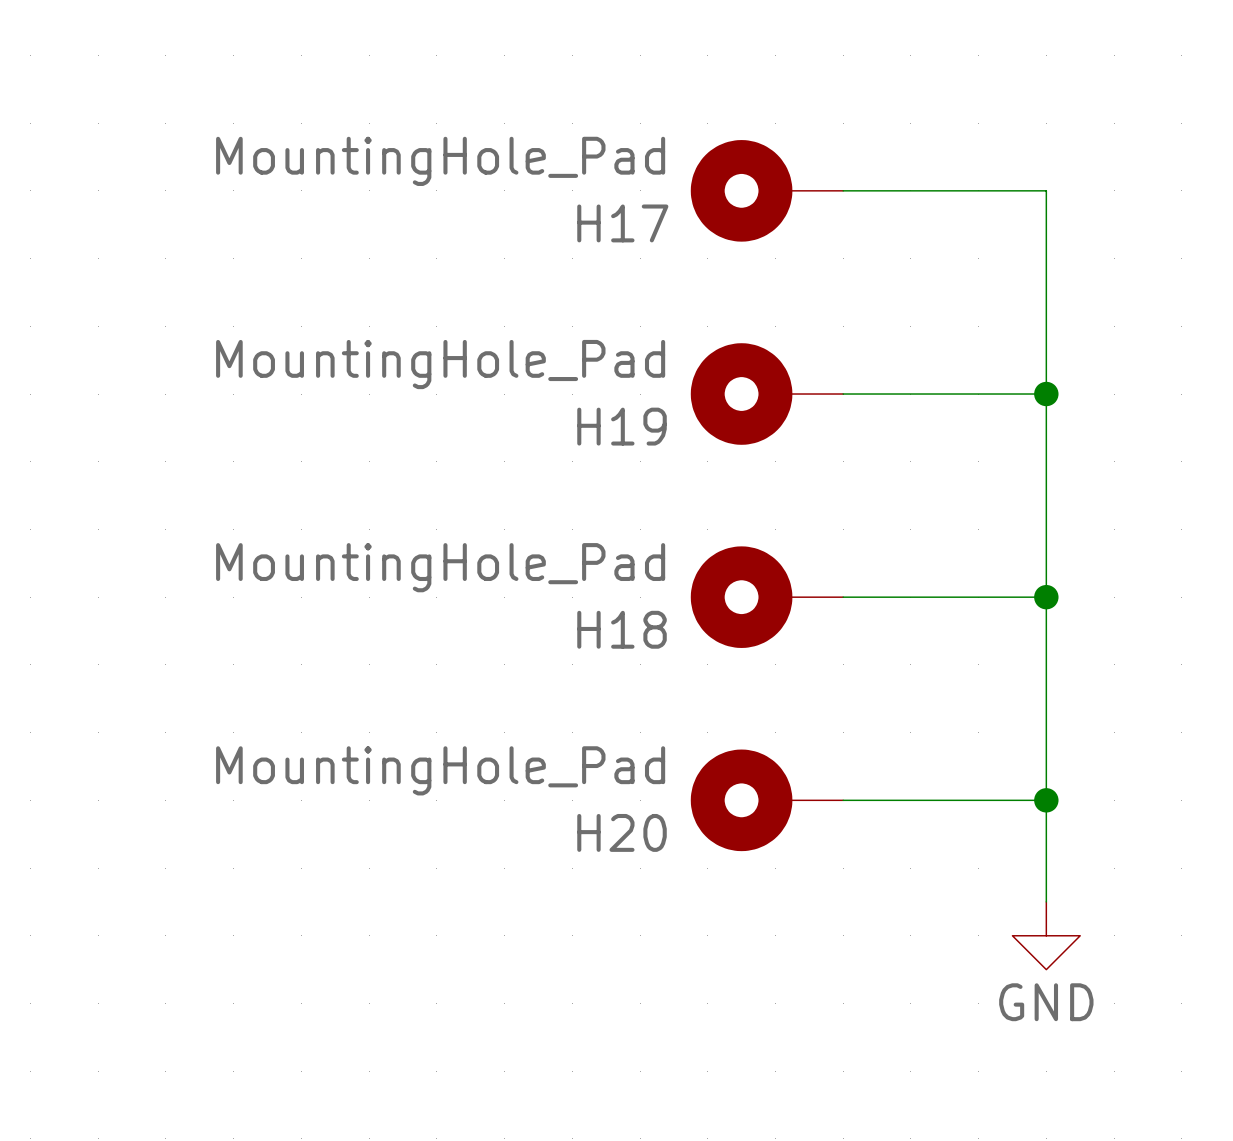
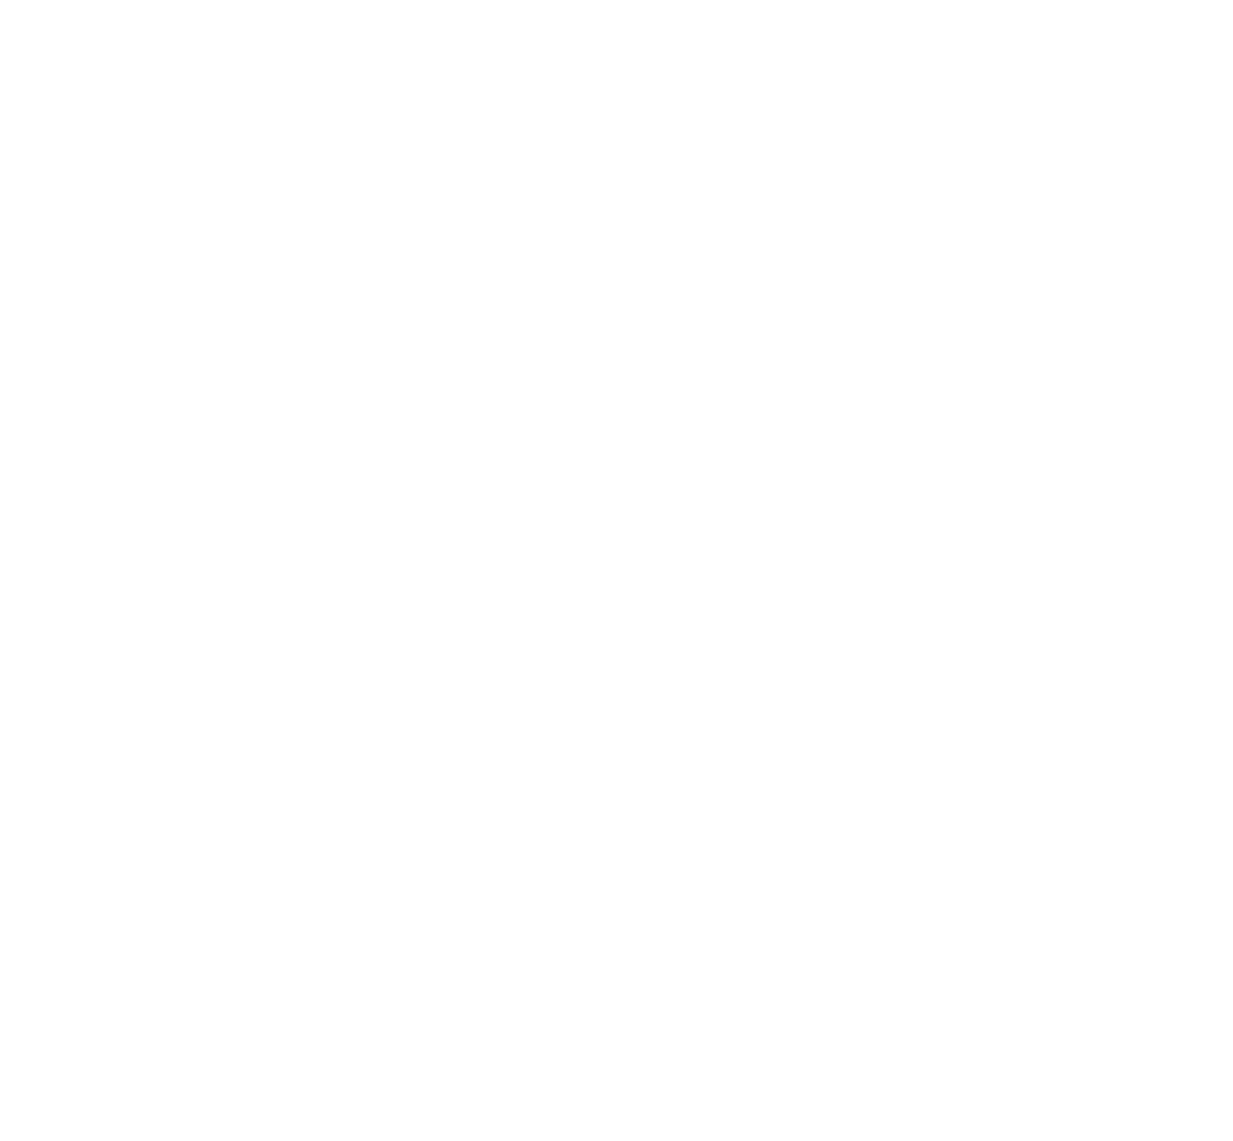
H17: MountingHole_Pad (766, 190) -> none
wire: (843, 190) (1046, 190) (1046, 901) -> none
H19: MountingHole_Pad (766, 394) -> none
wire: (843, 394) (1046, 394) -> none
junction: (1046, 394) -> none
H18: MountingHole_Pad (766, 597) -> none
wire: (843, 597) (1046, 597) -> none
junction: (1046, 597) -> none
H20: MountingHole_Pad (766, 800) -> none
wire: (843, 800) (1046, 800) -> none
junction: (1046, 800) -> none
power symbol: GND (1046, 935) -> none

